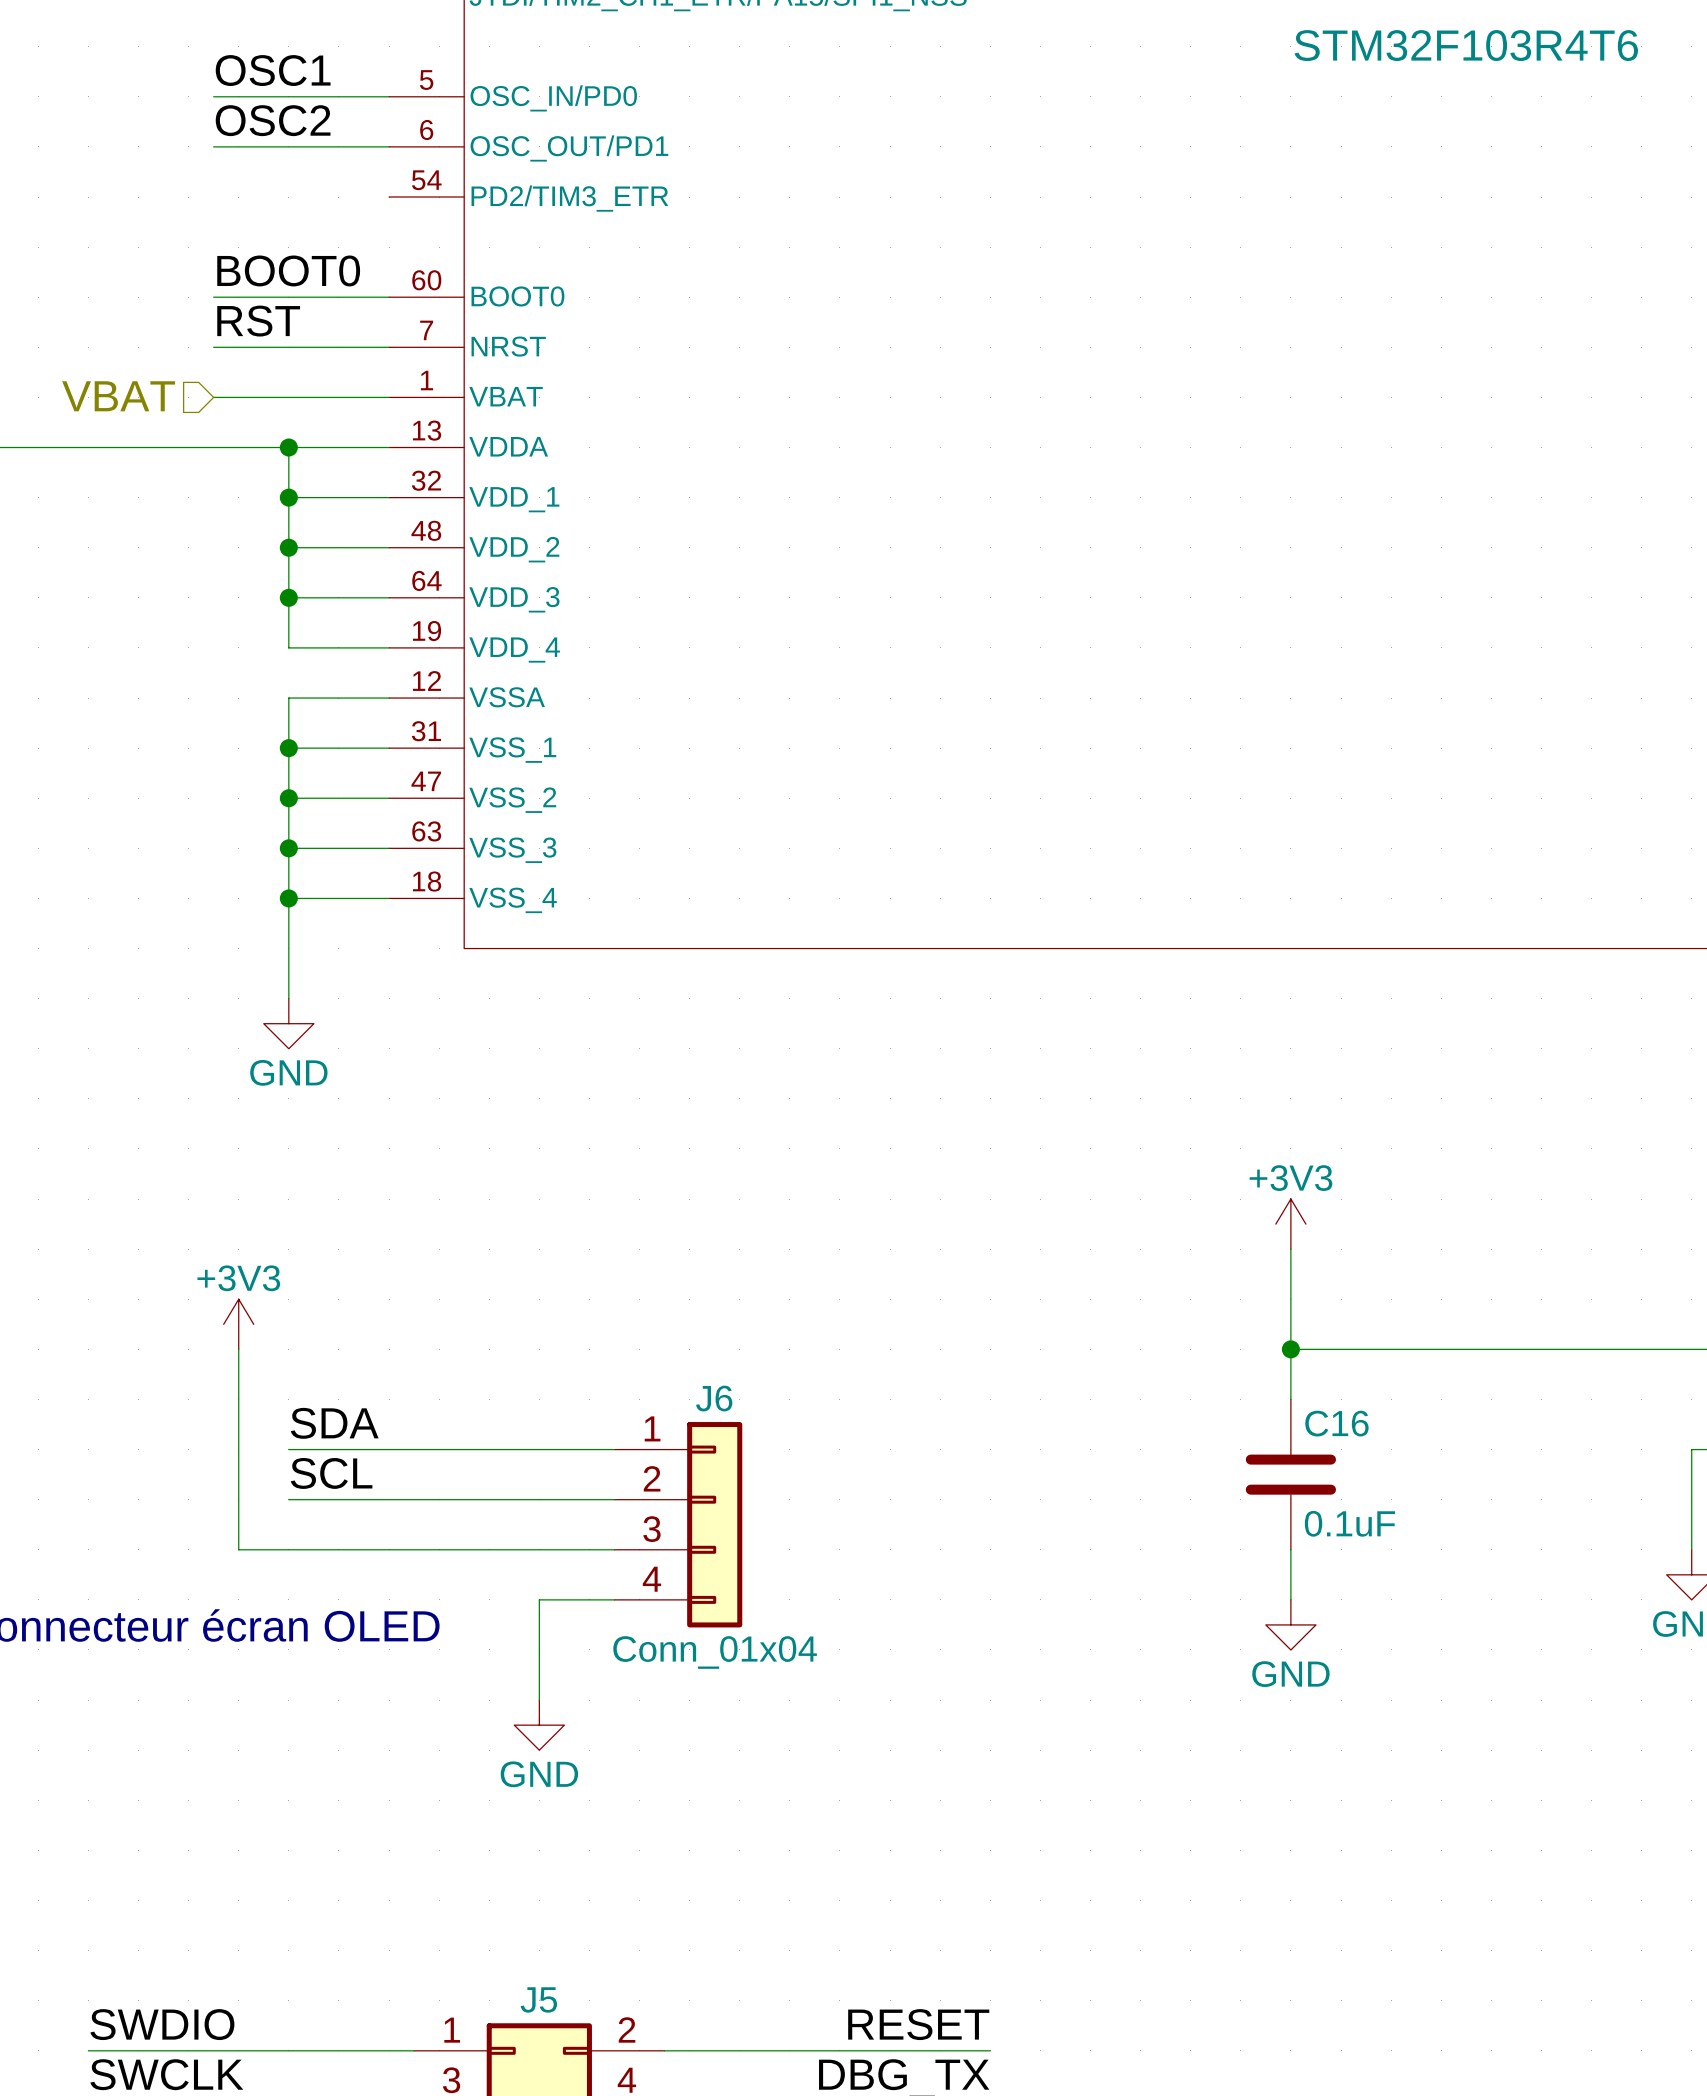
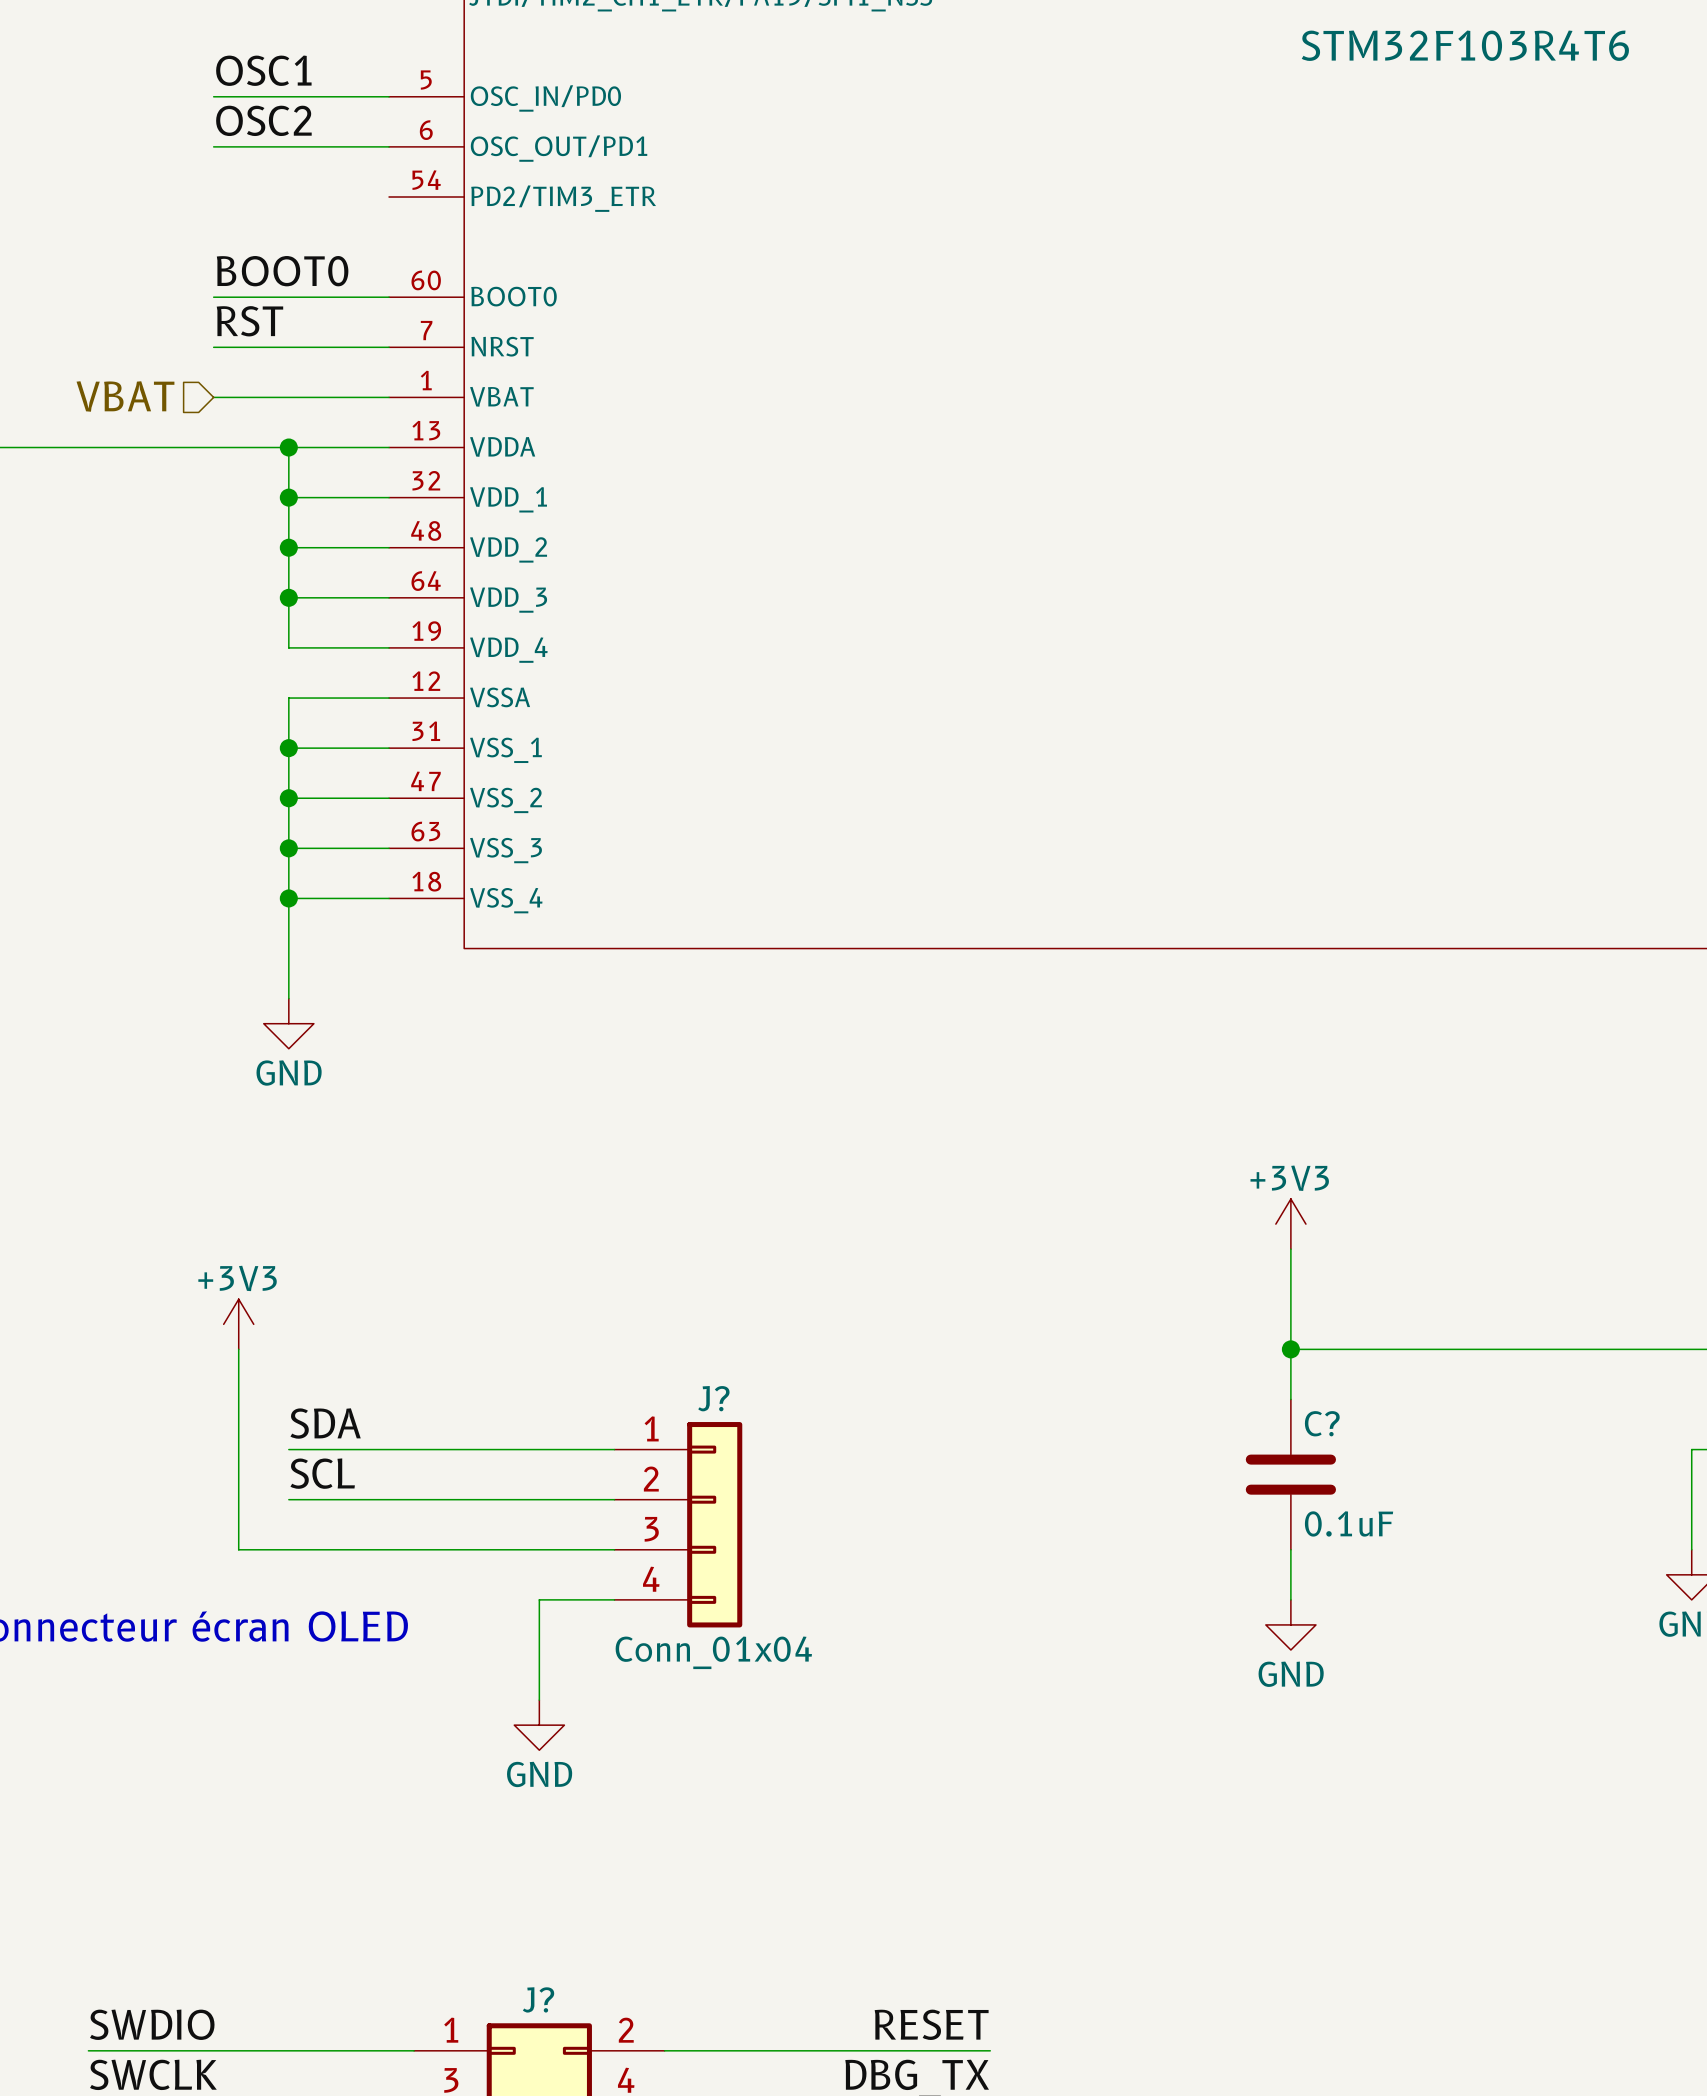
J6 name: J6 (714, 1398) -> J? (713, 1398)
C16 name: C16 (1336, 1423) -> C? (1322, 1423)
J5 name: J5 (538, 1999) -> J? (538, 1999)

